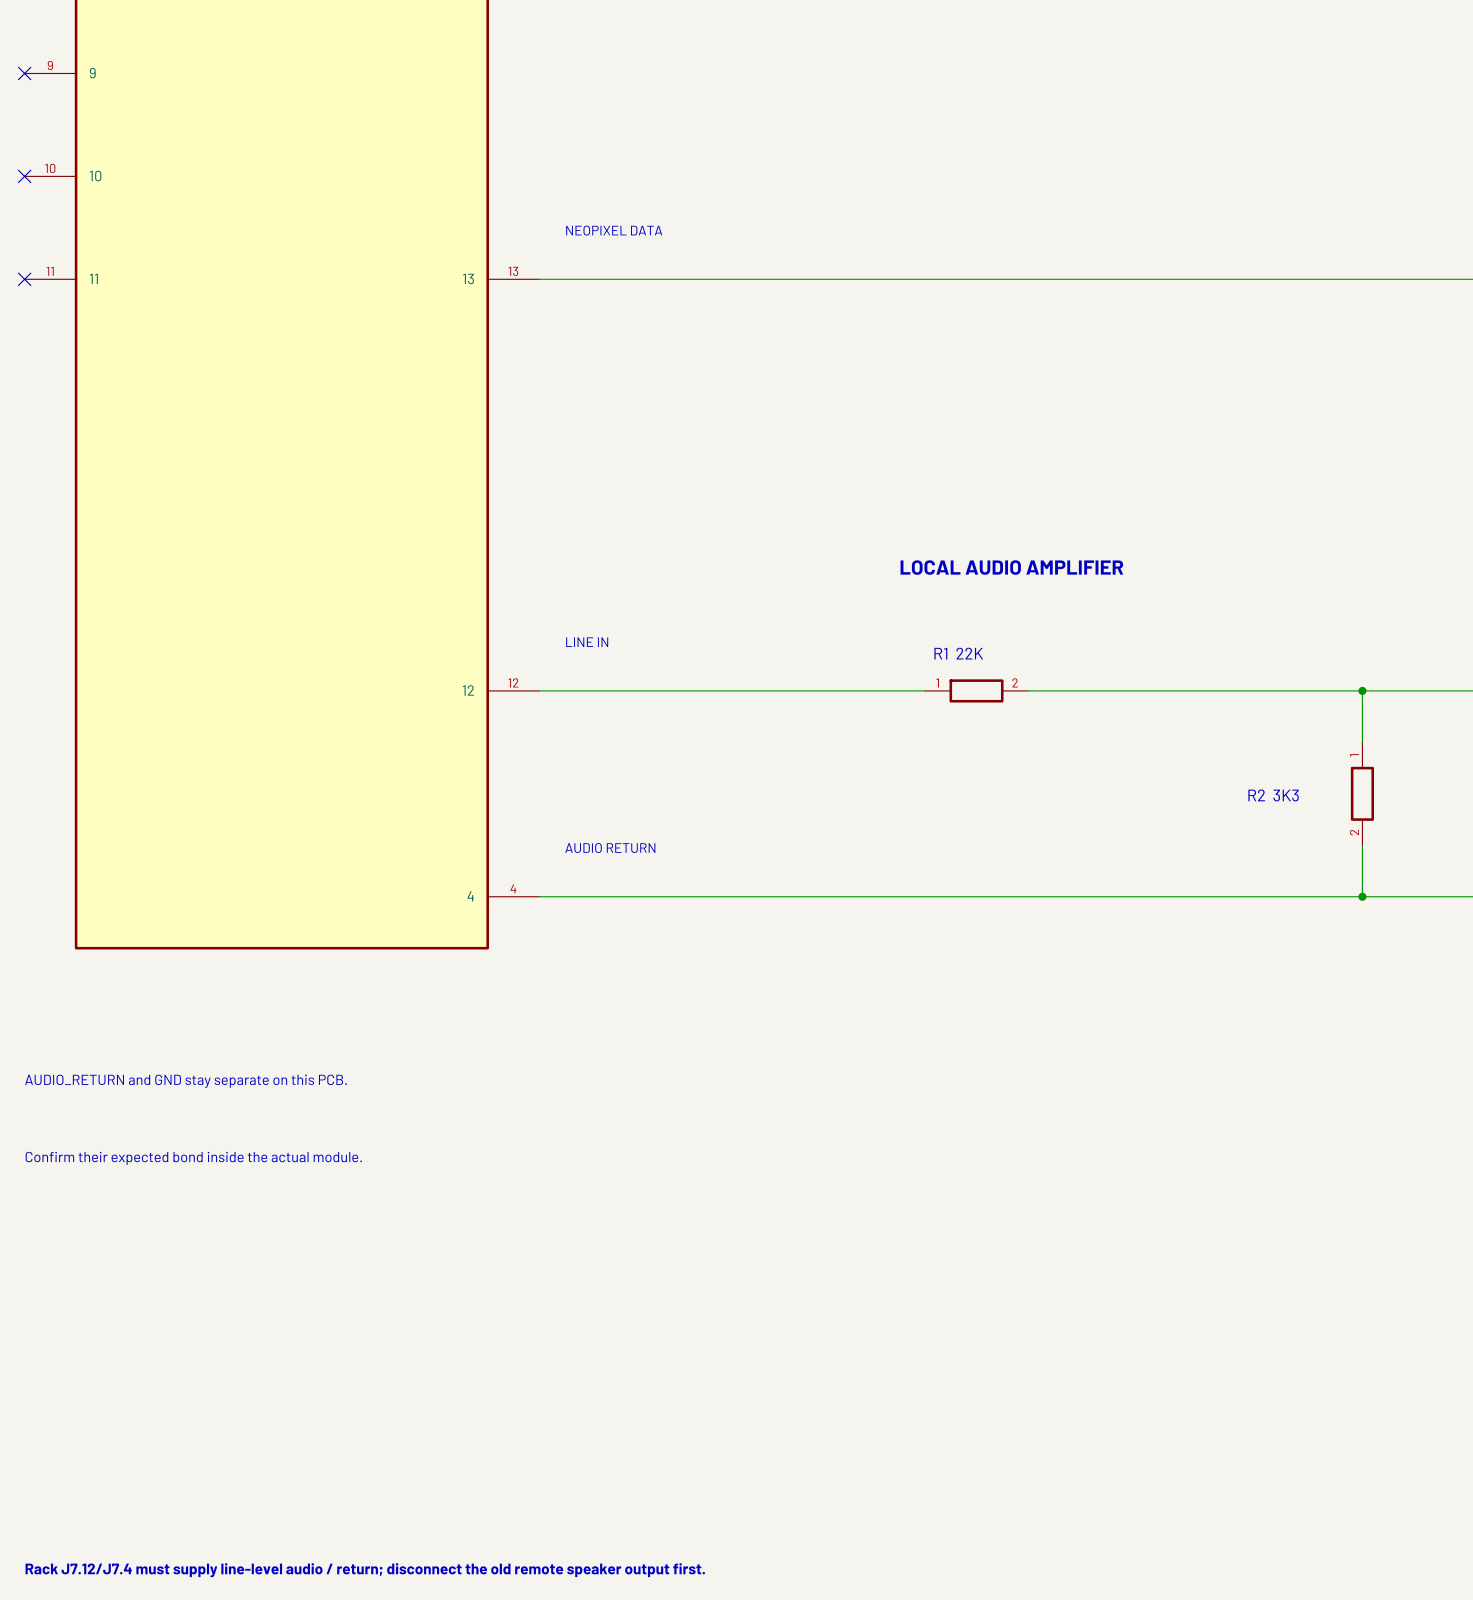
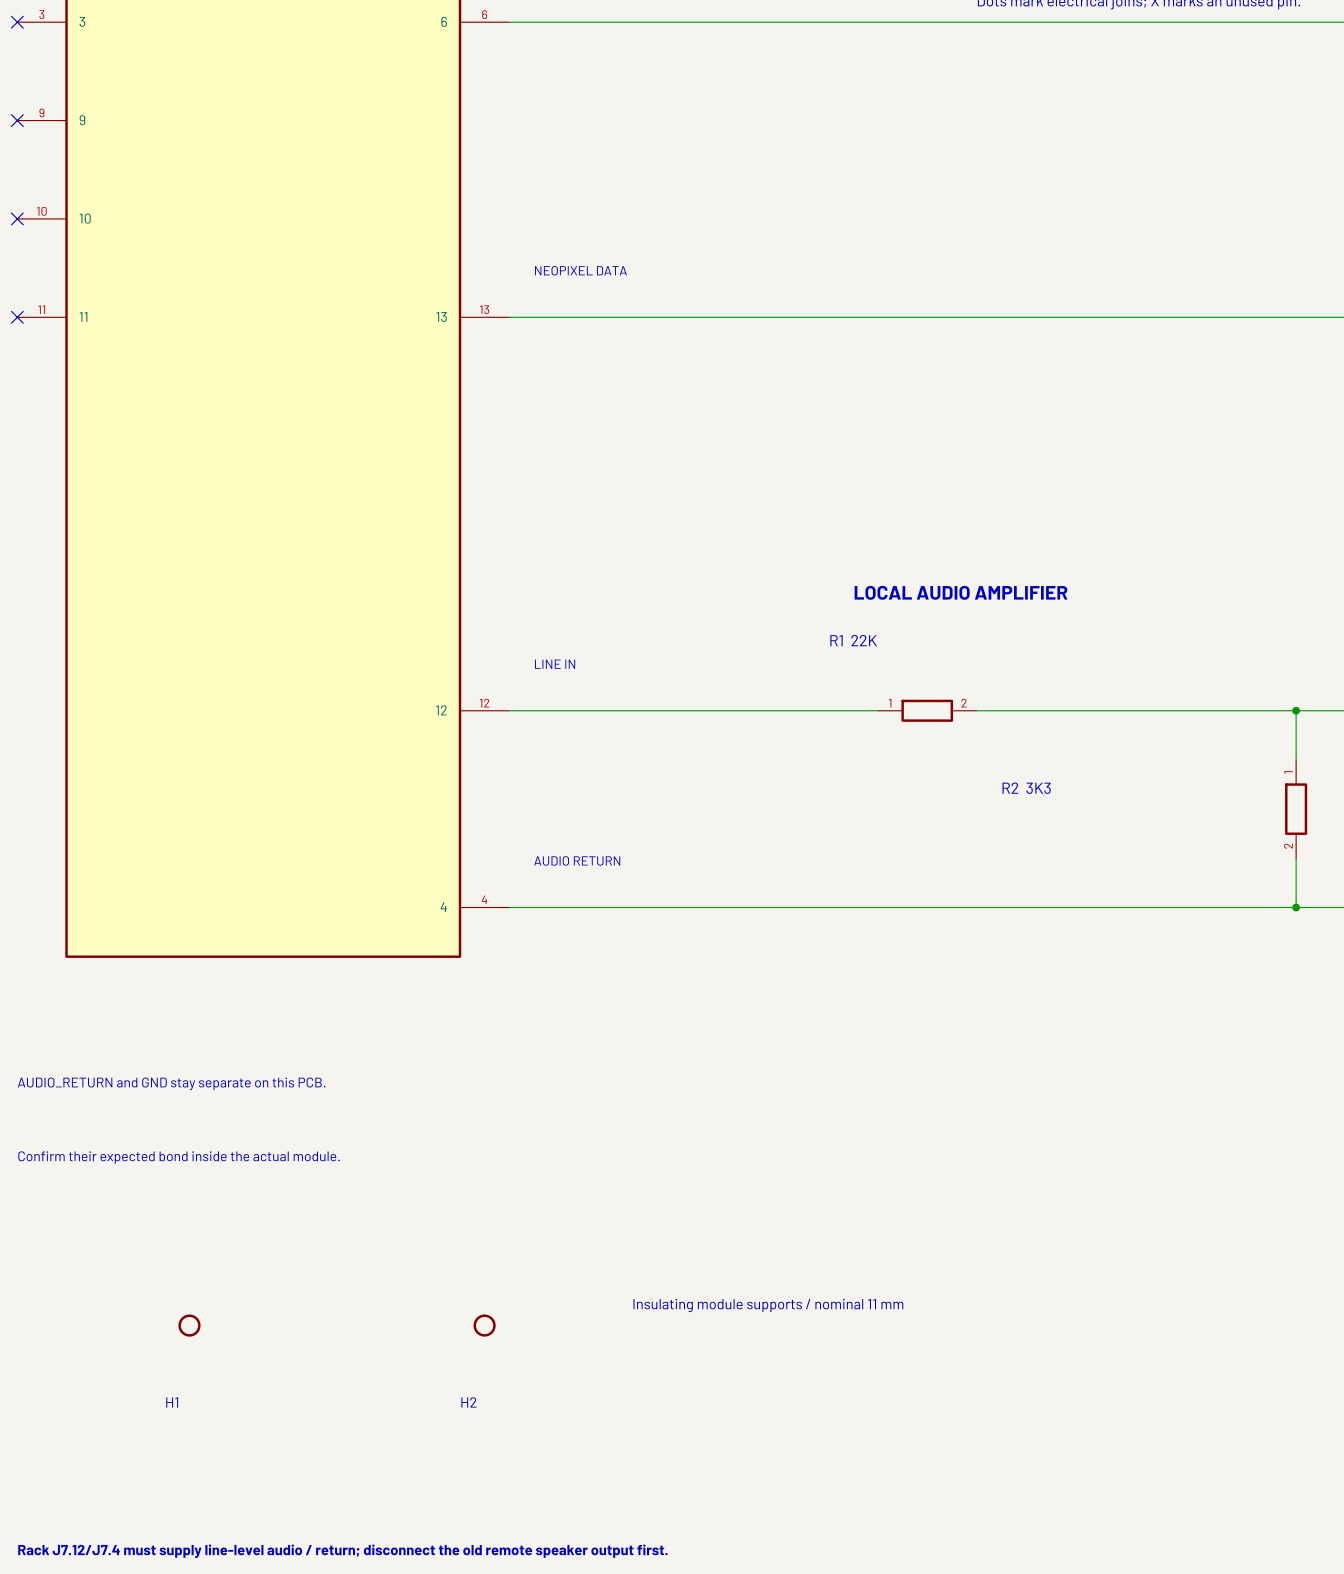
text position: R1 22K (958, 653) -> R1 22K (853, 640)
text position: R2 3K3 (1273, 795) -> R2 3K3 (1026, 788)
text: none -> Insulating module supports / nominal 11 mm (768, 1305)
part: none -> (189, 1325)
part: none -> (484, 1325)
text: none -> H1 (172, 1402)
text: none -> H2 (468, 1402)

